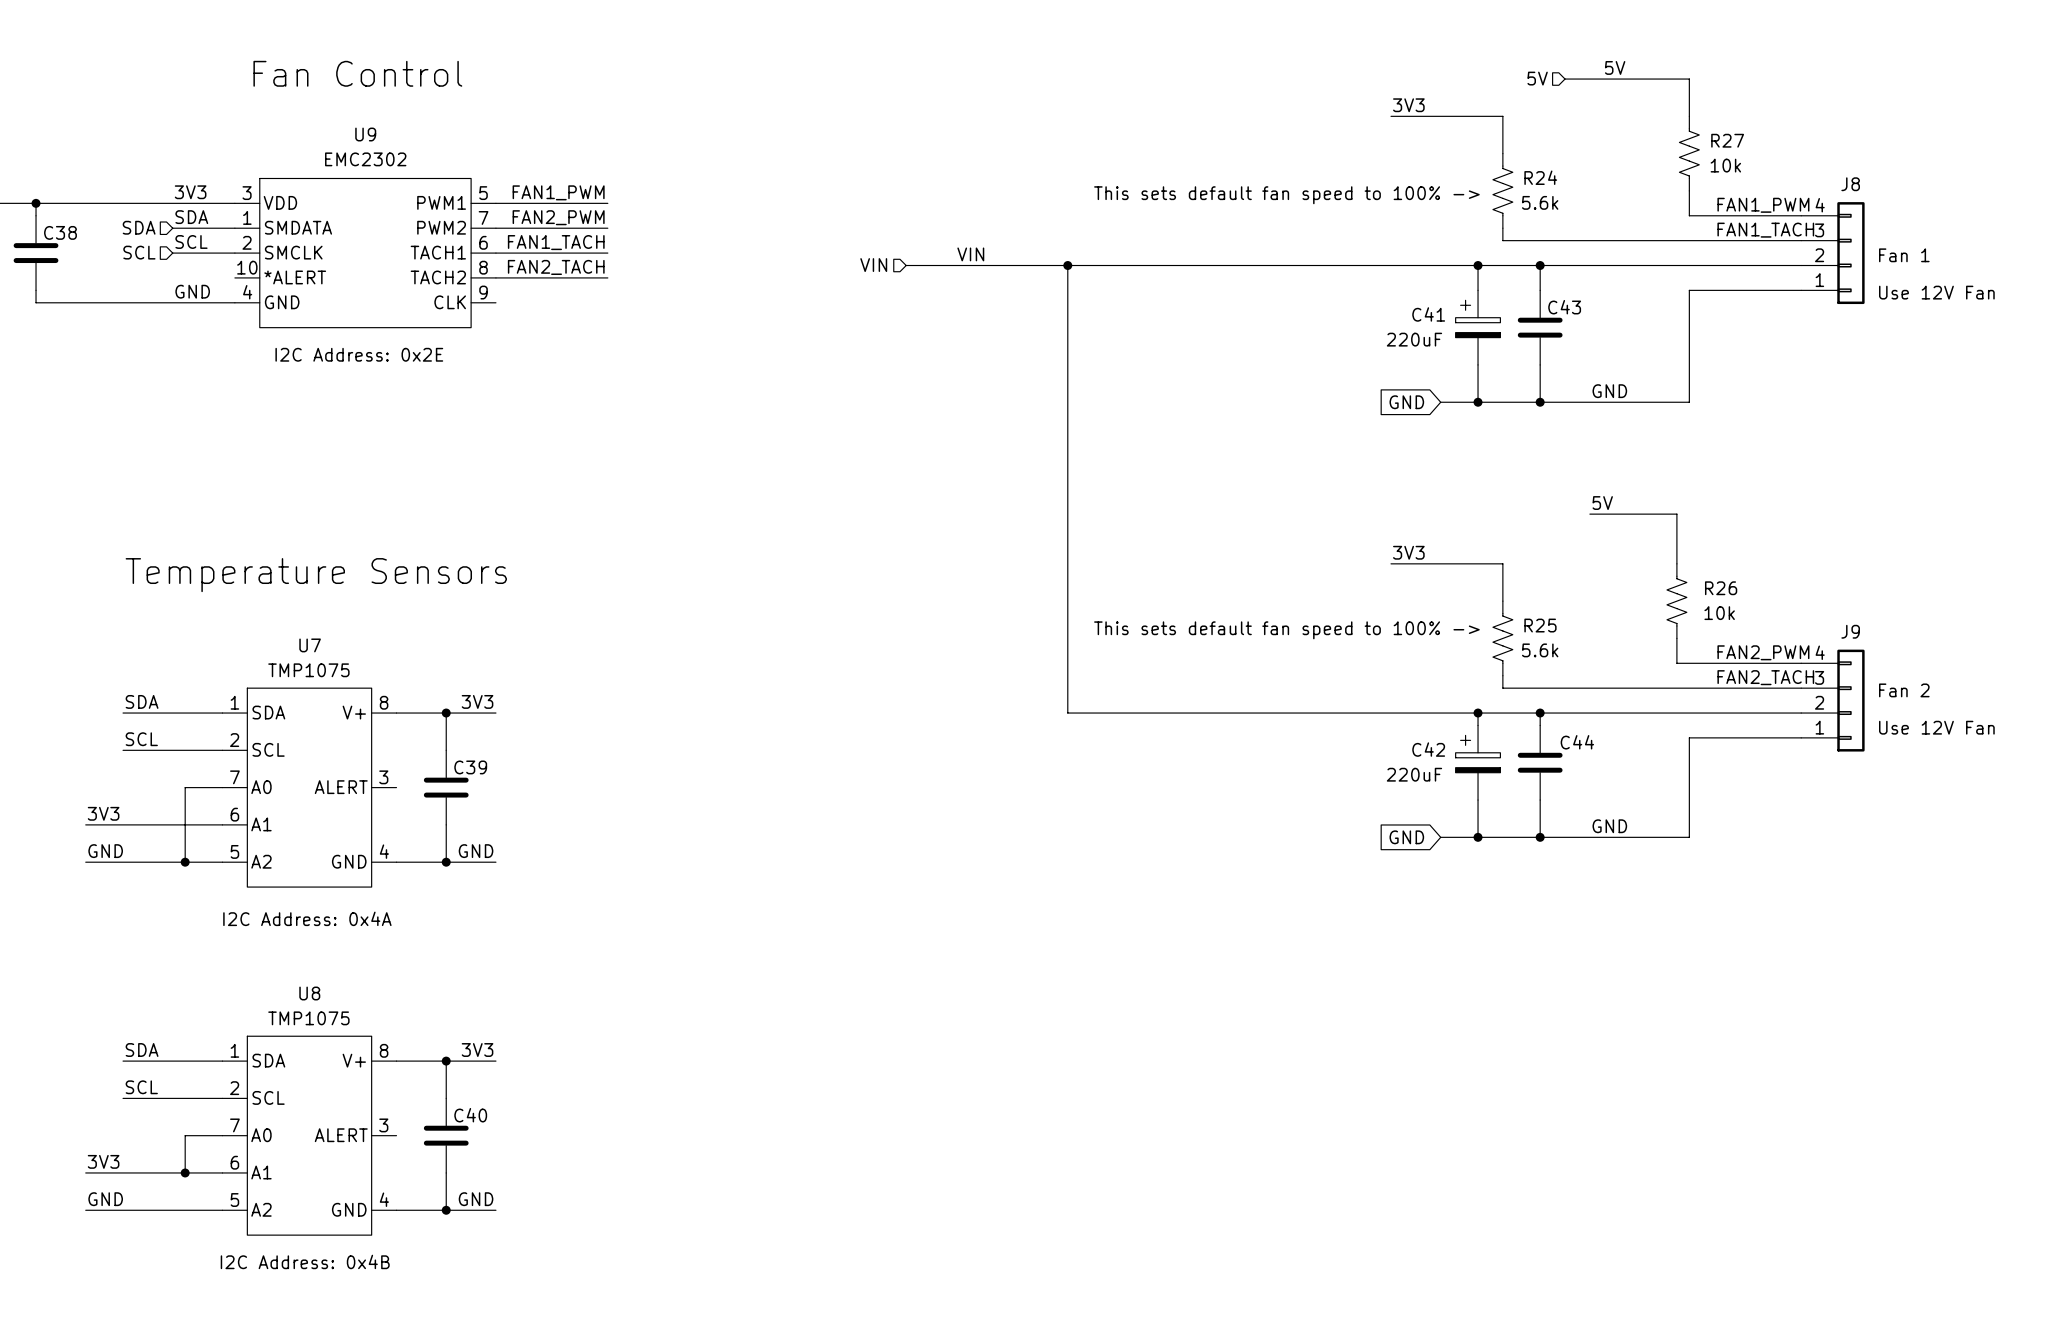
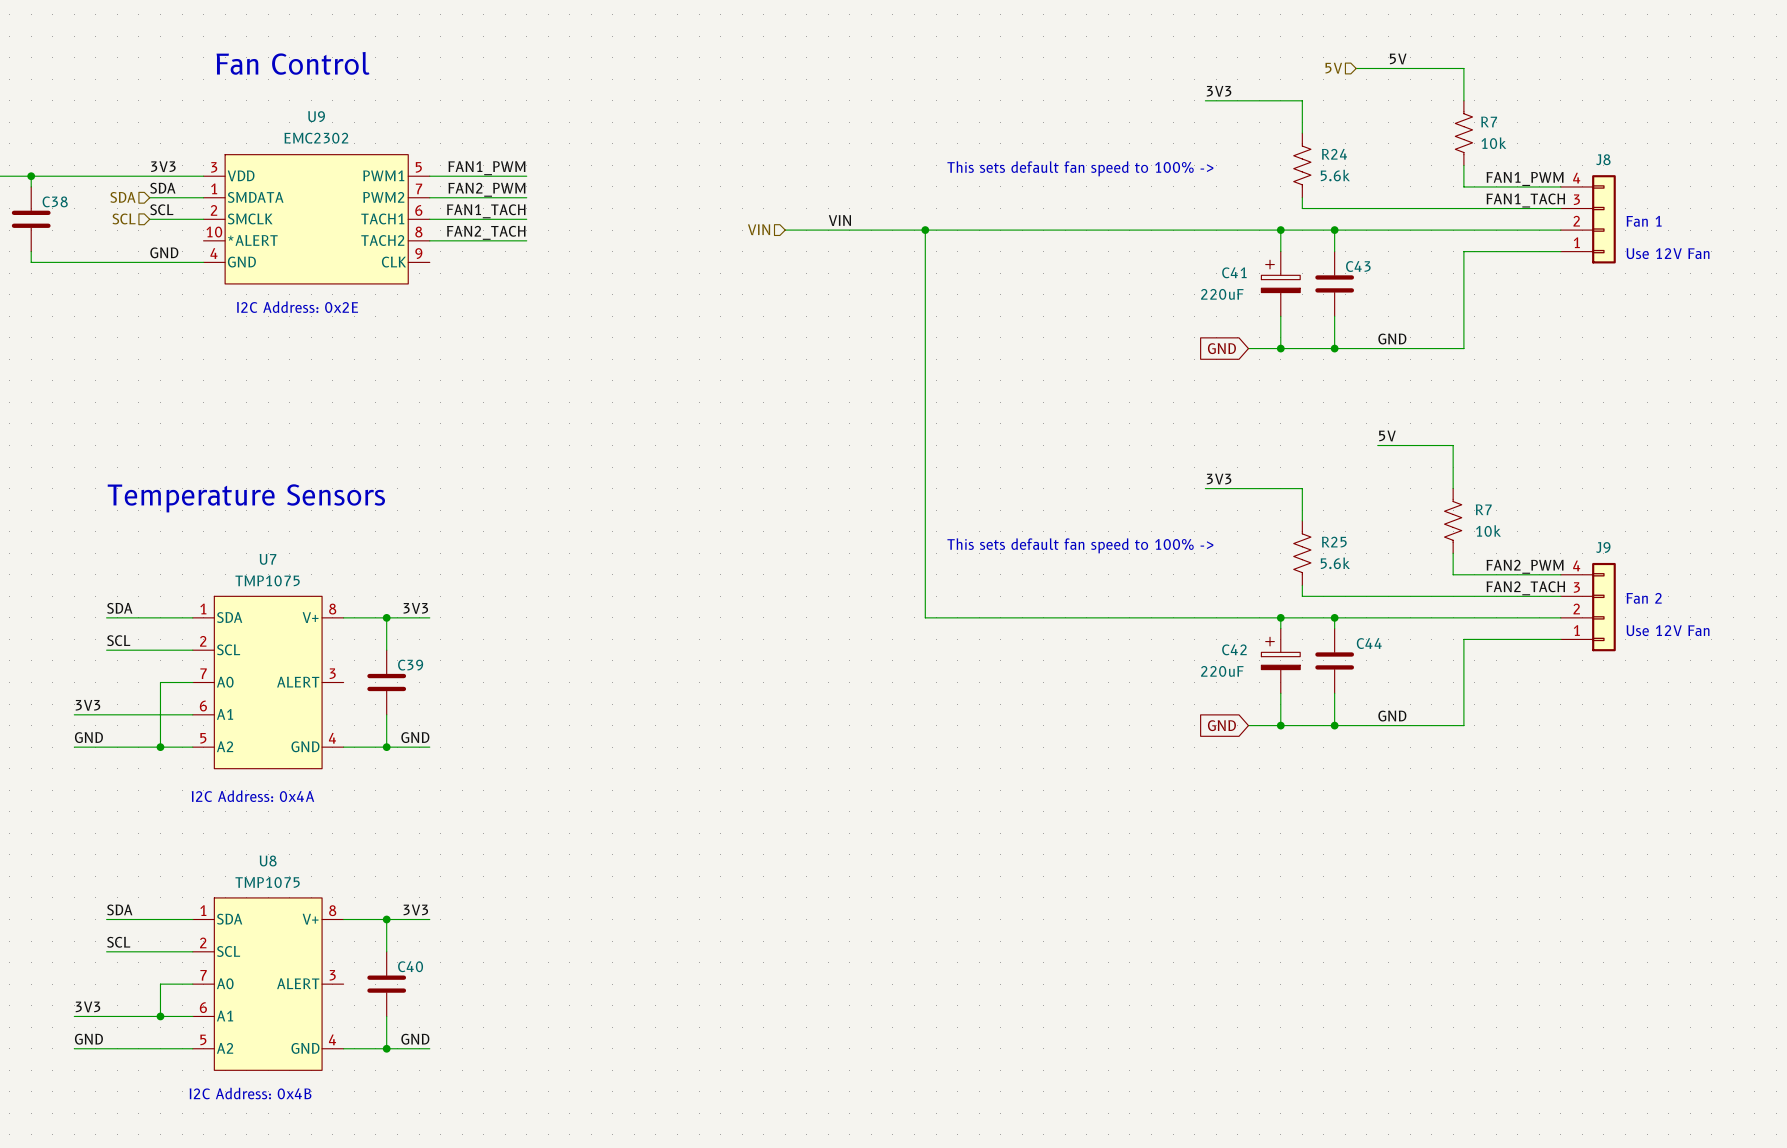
R27 name: R27 (1727, 140) -> R7 (1489, 121)
R26 name: R26 (1721, 588) -> R7 (1483, 509)

